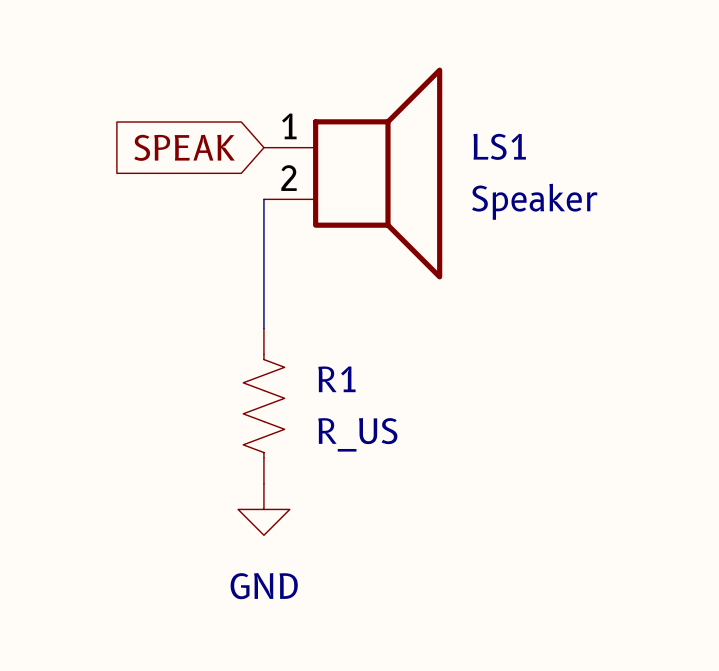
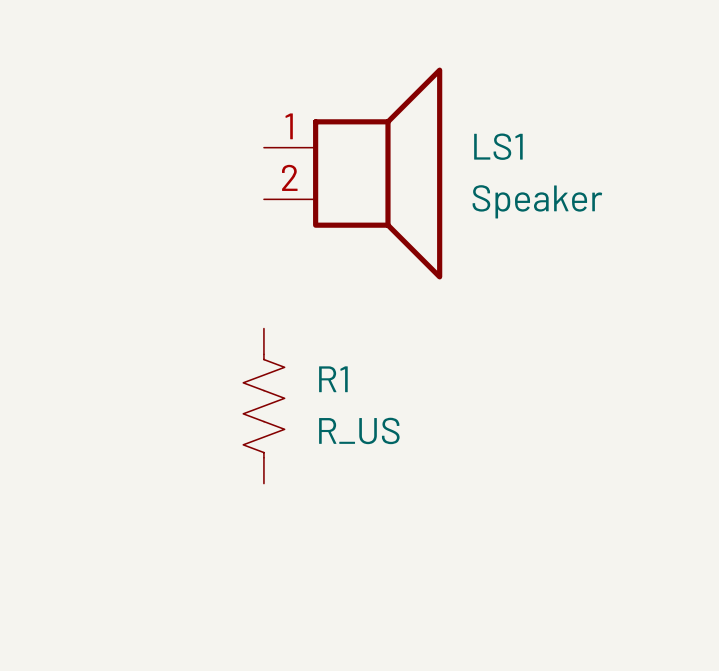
global label: SPEAK (184, 147) -> none
wire: (263, 199) (263, 328) -> none
power symbol: GND (263, 509) -> none

